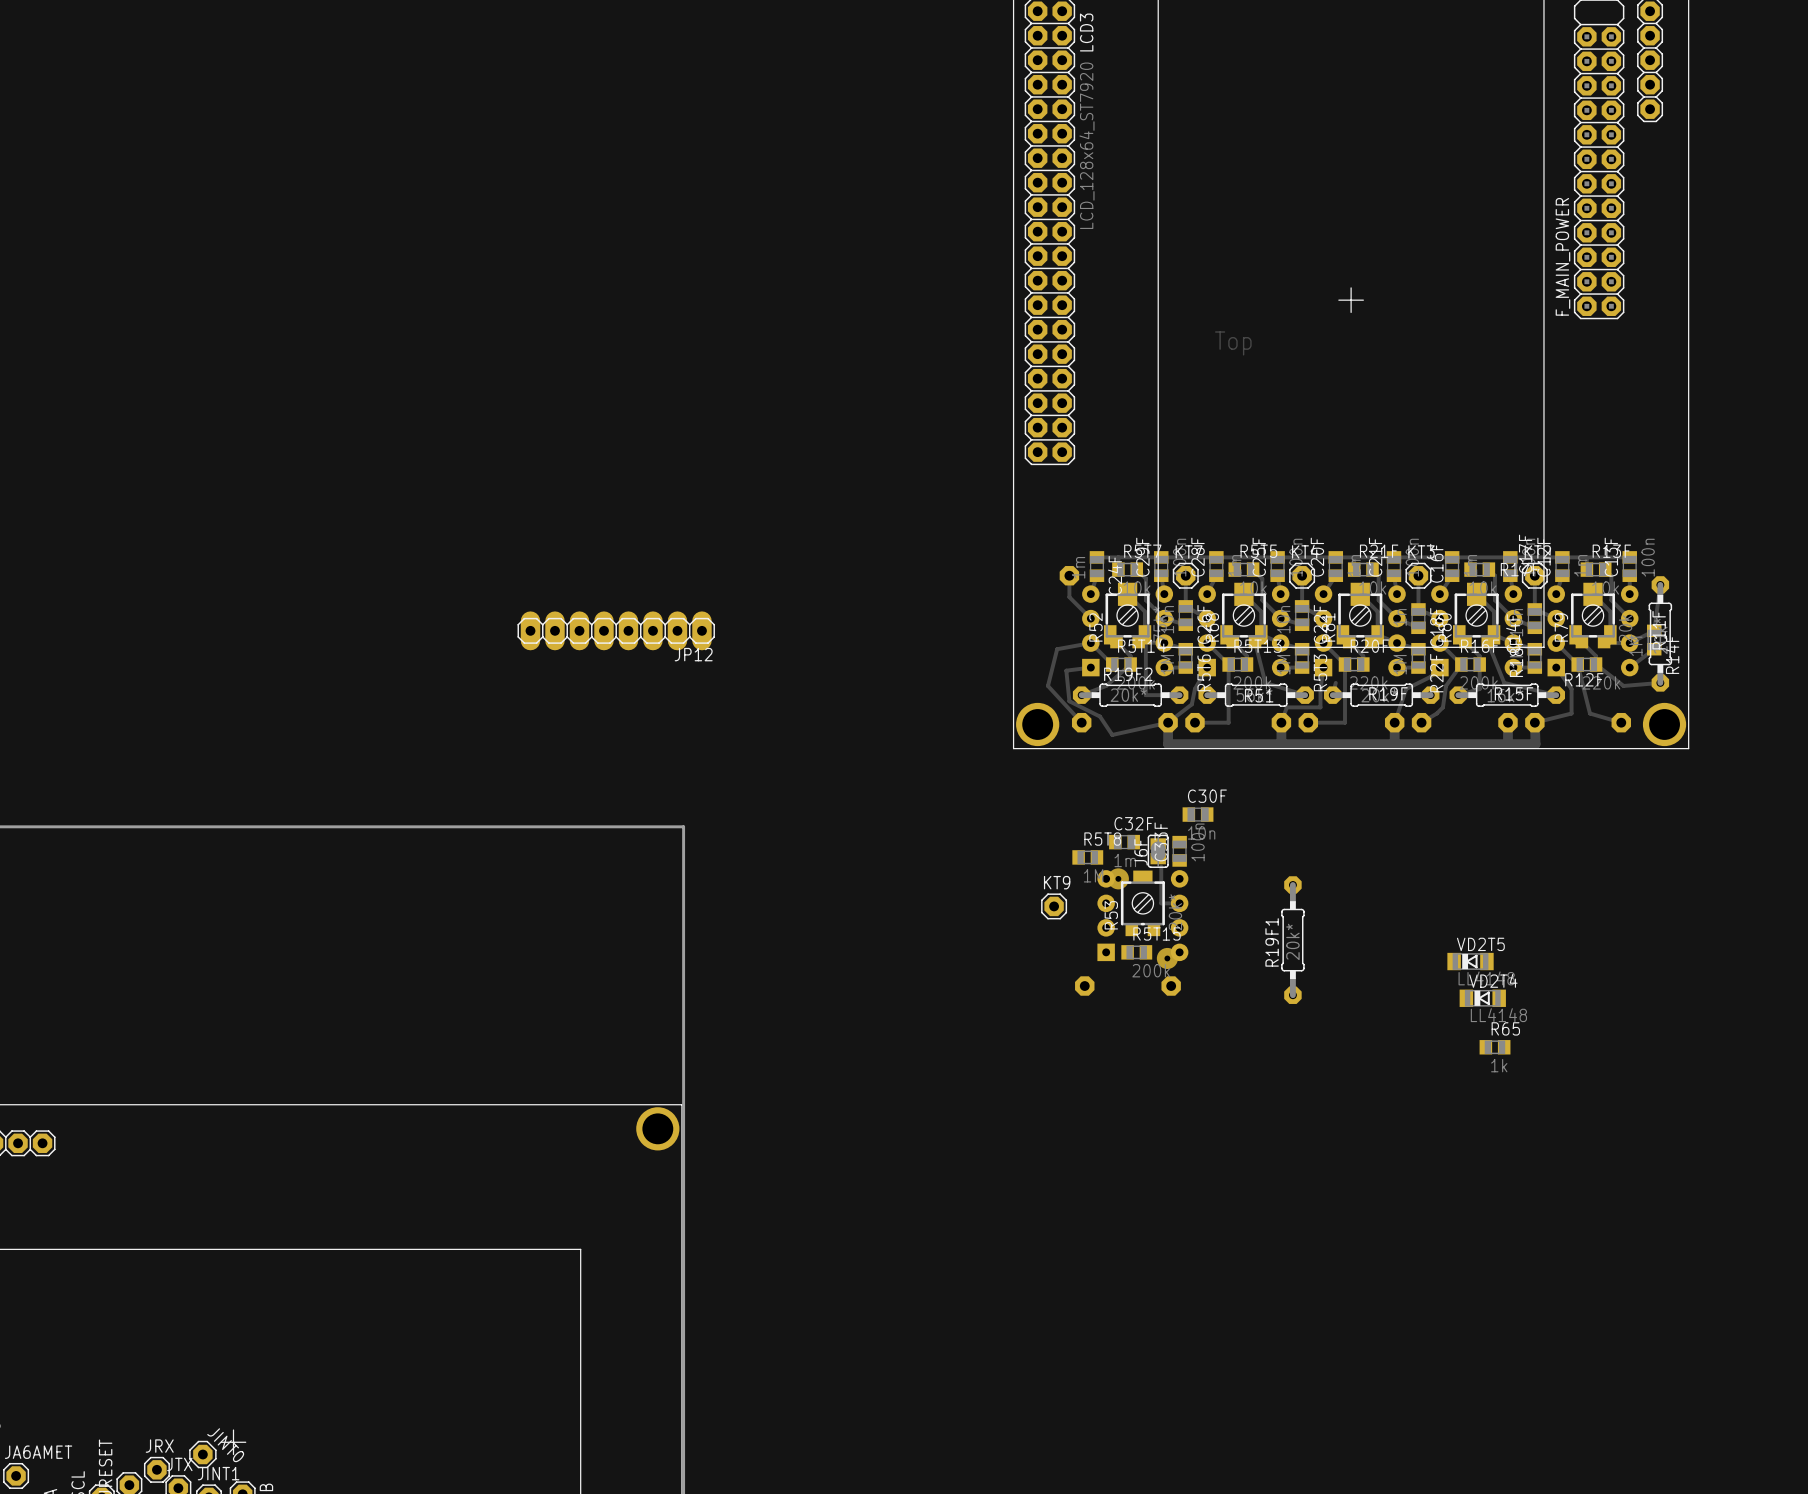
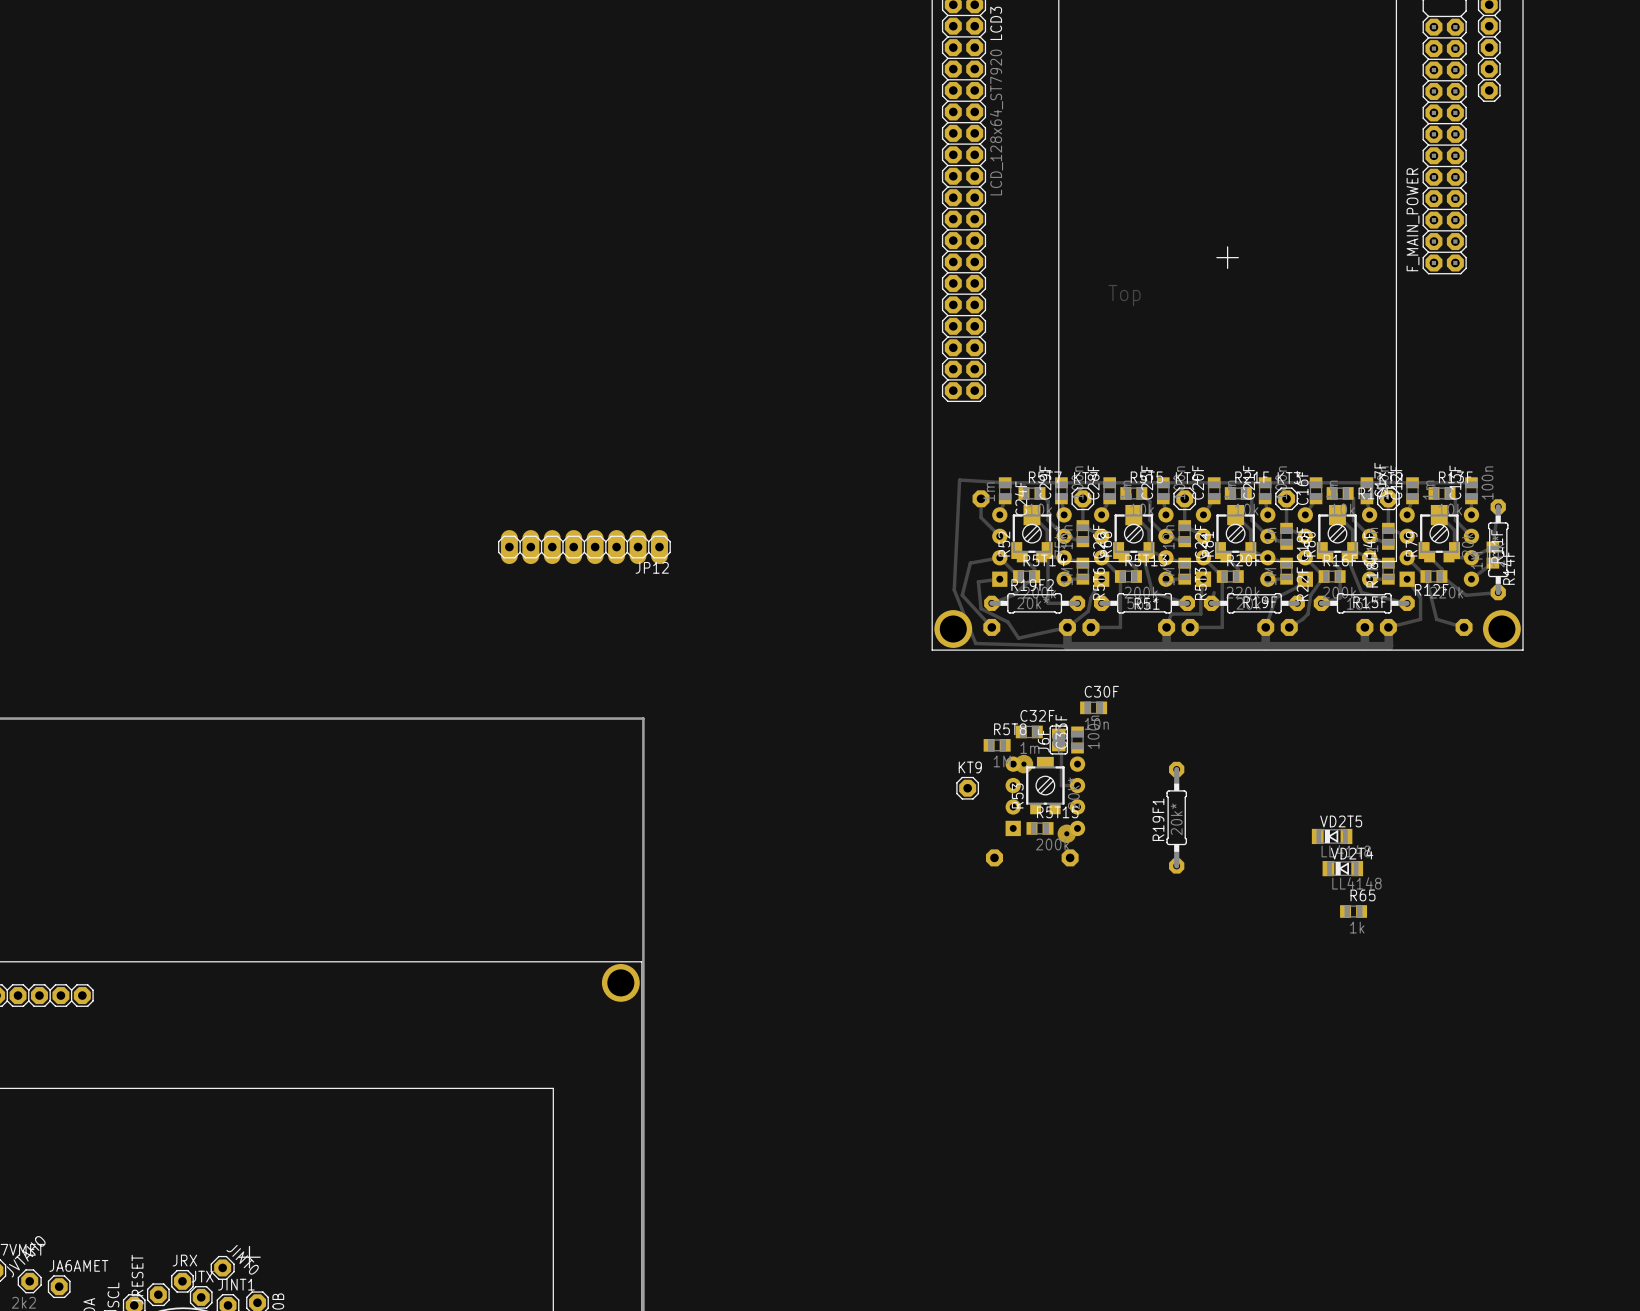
track: none -> (1005, 482) (959, 480) (954, 589) (975, 643) (1067, 646)

